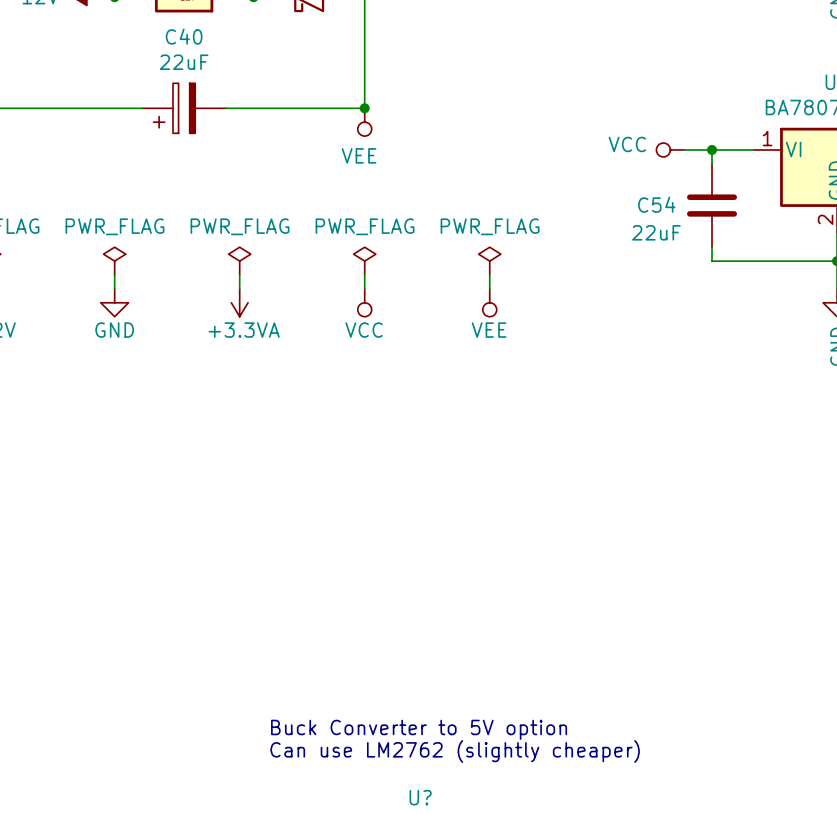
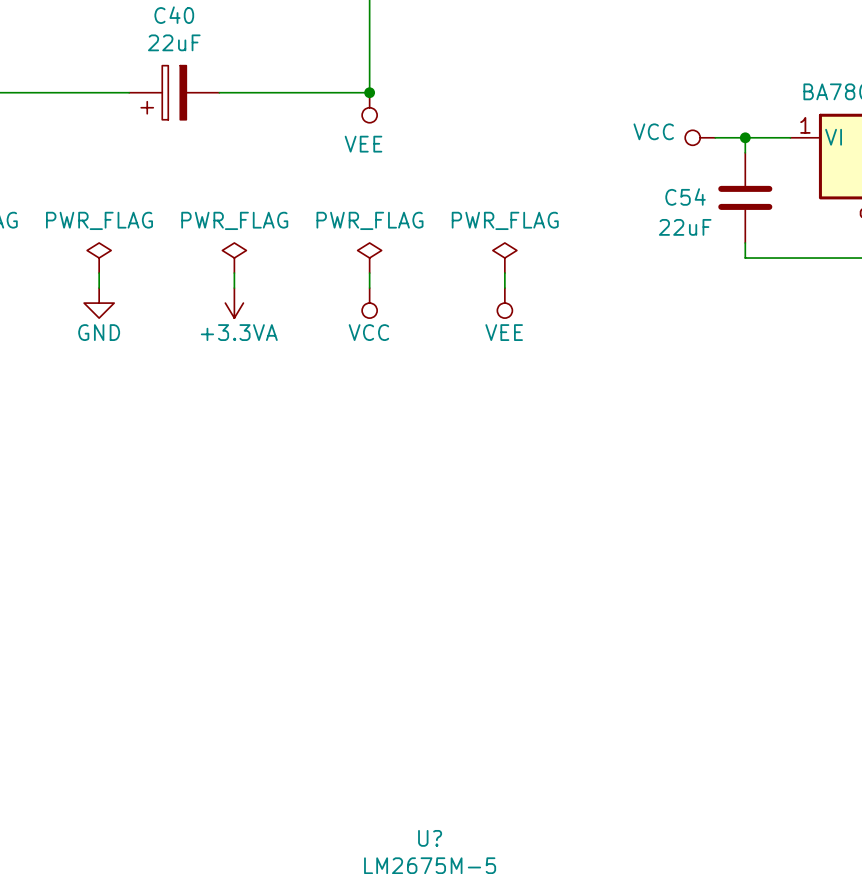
text: Buck Converter to 5V option (419, 729) -> none
text: Can use LM2762 (slightly cheaper) (455, 751) -> none

